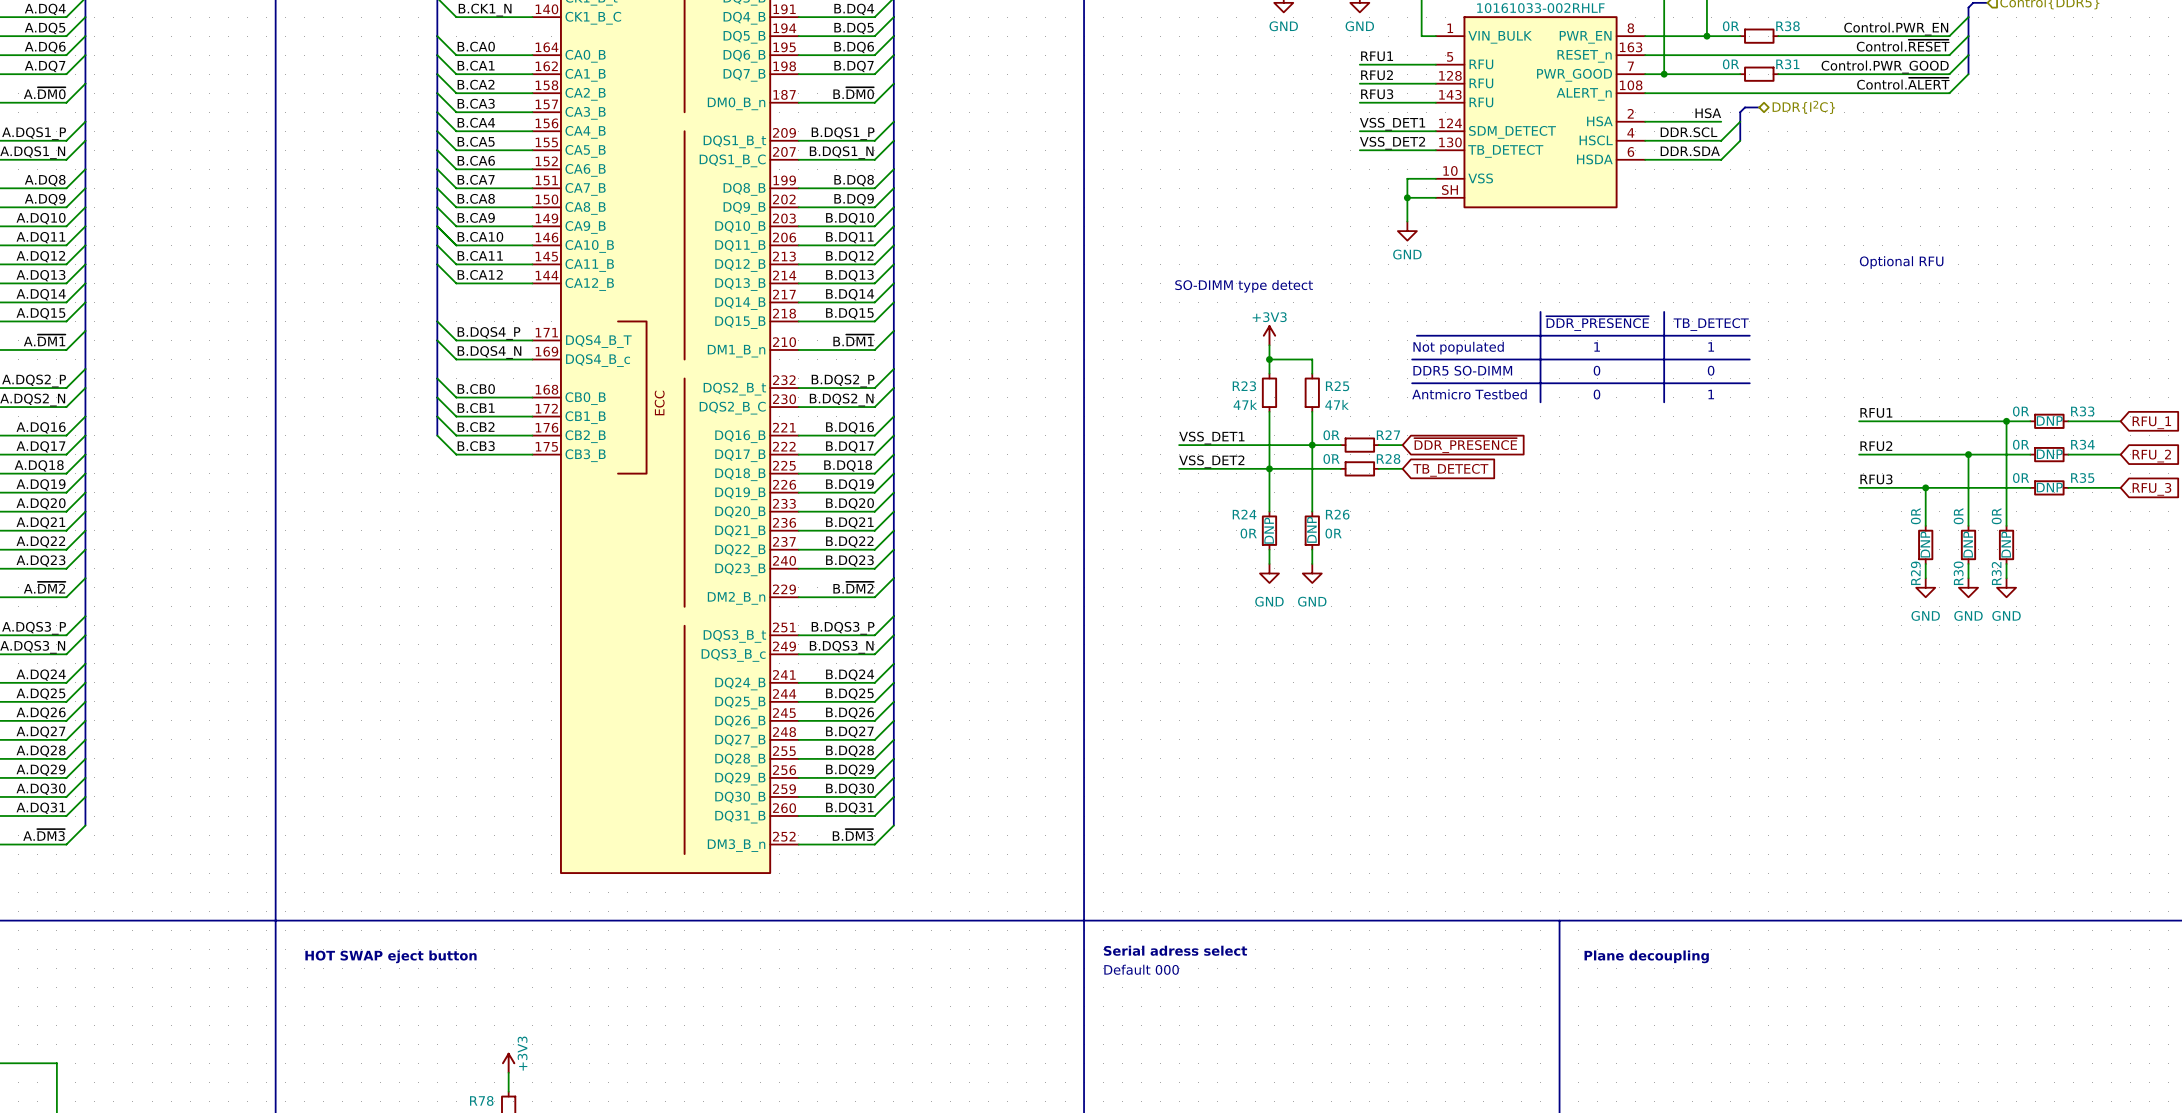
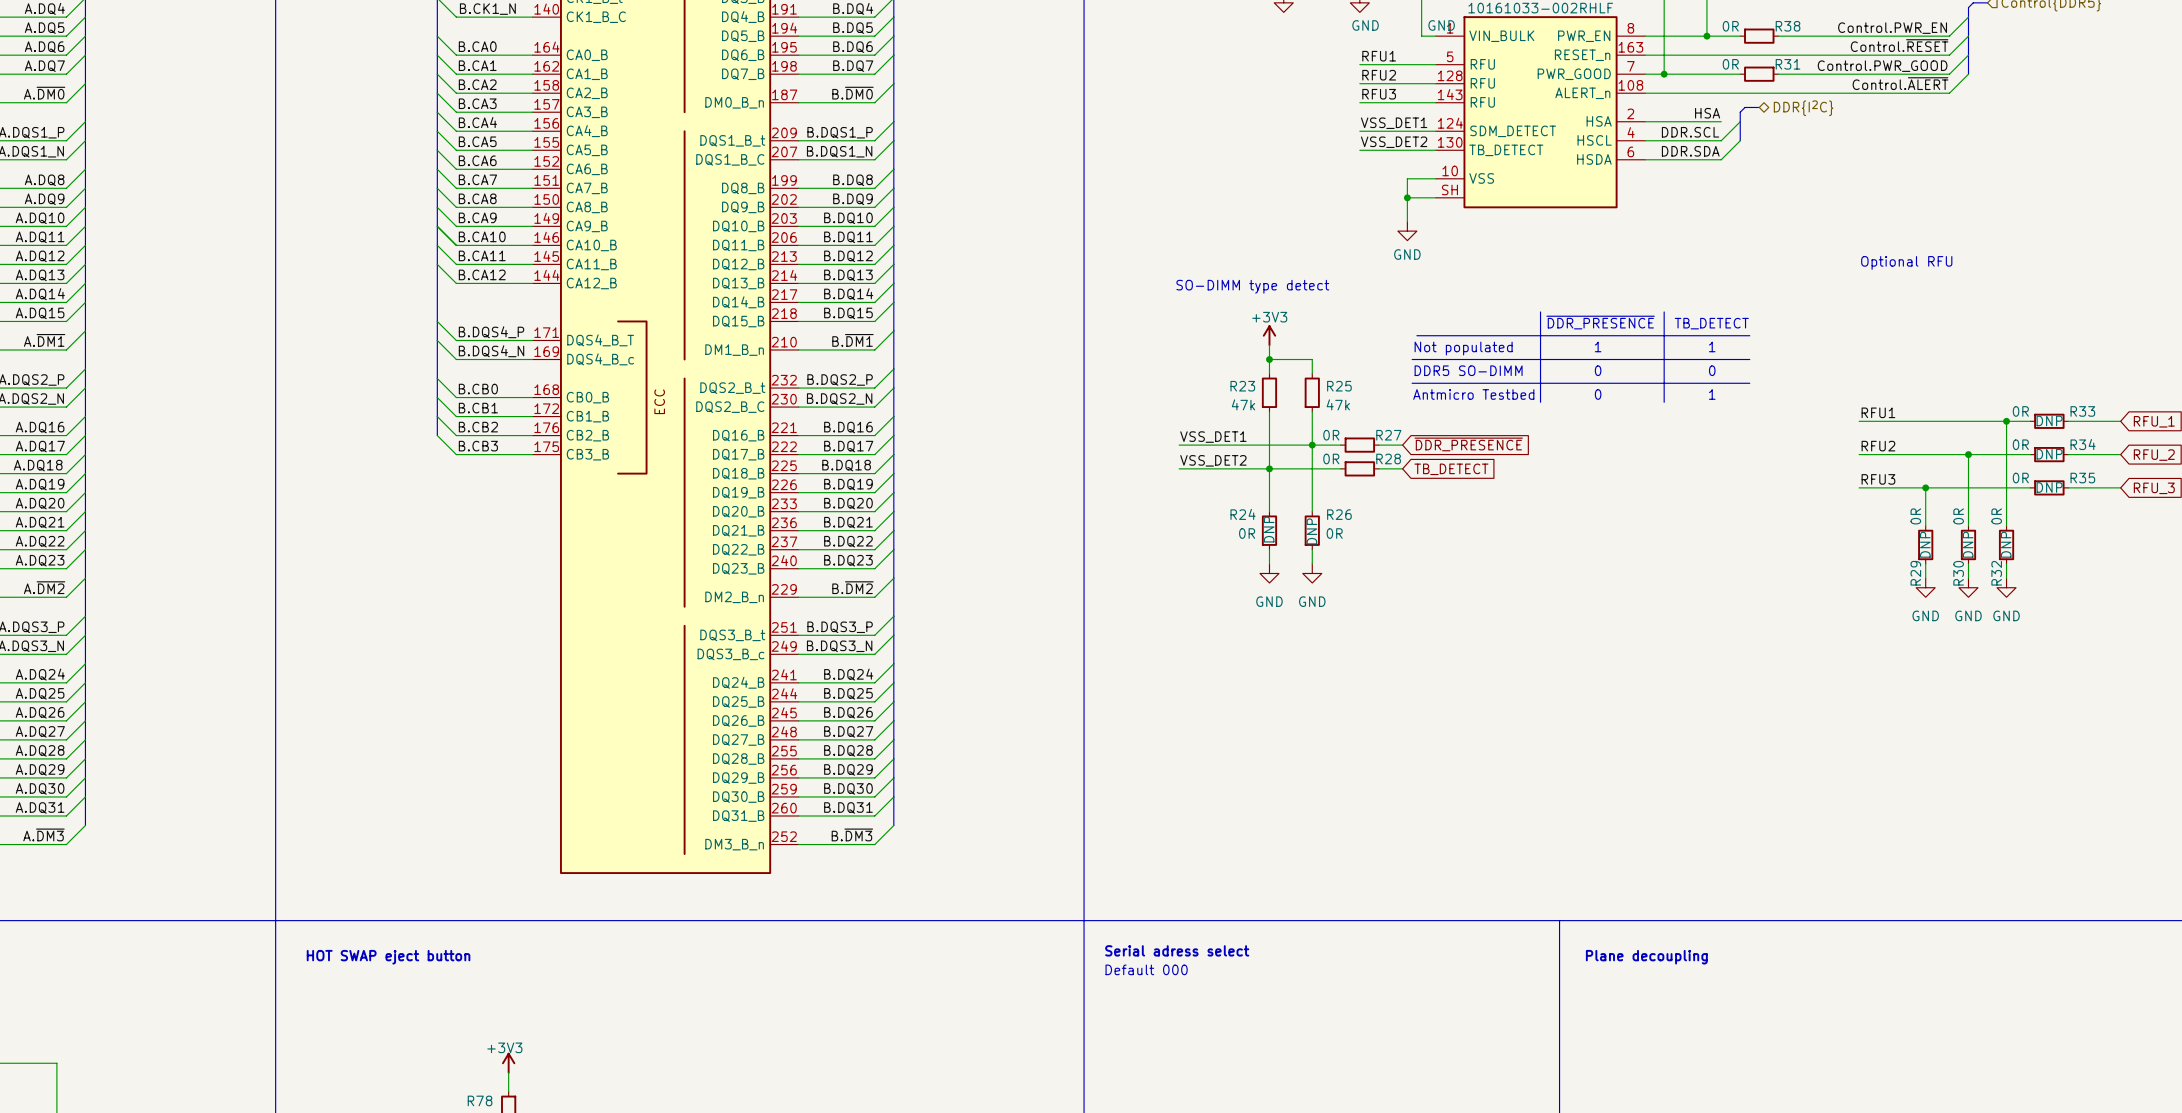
power symbol text position: GND (1283, 26) -> GND (1365, 25)
power symbol text position: GND (1359, 26) -> GND (1441, 25)
power symbol text rotation: 0° (522, 1053) -> 90° clockwise (504, 1047)

